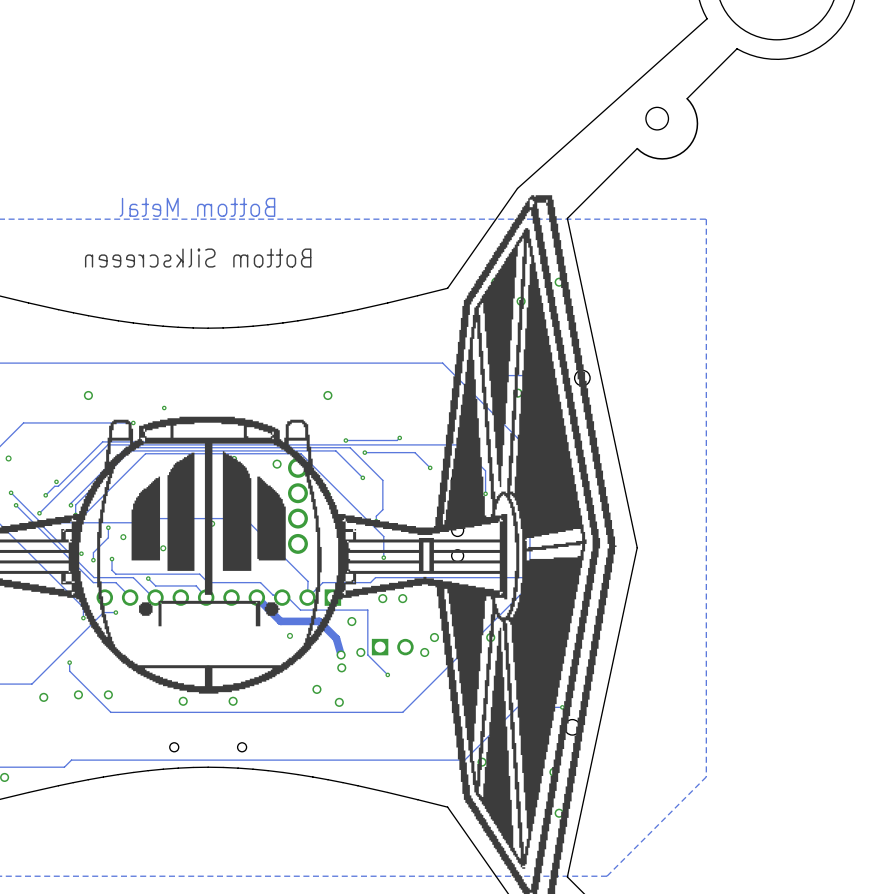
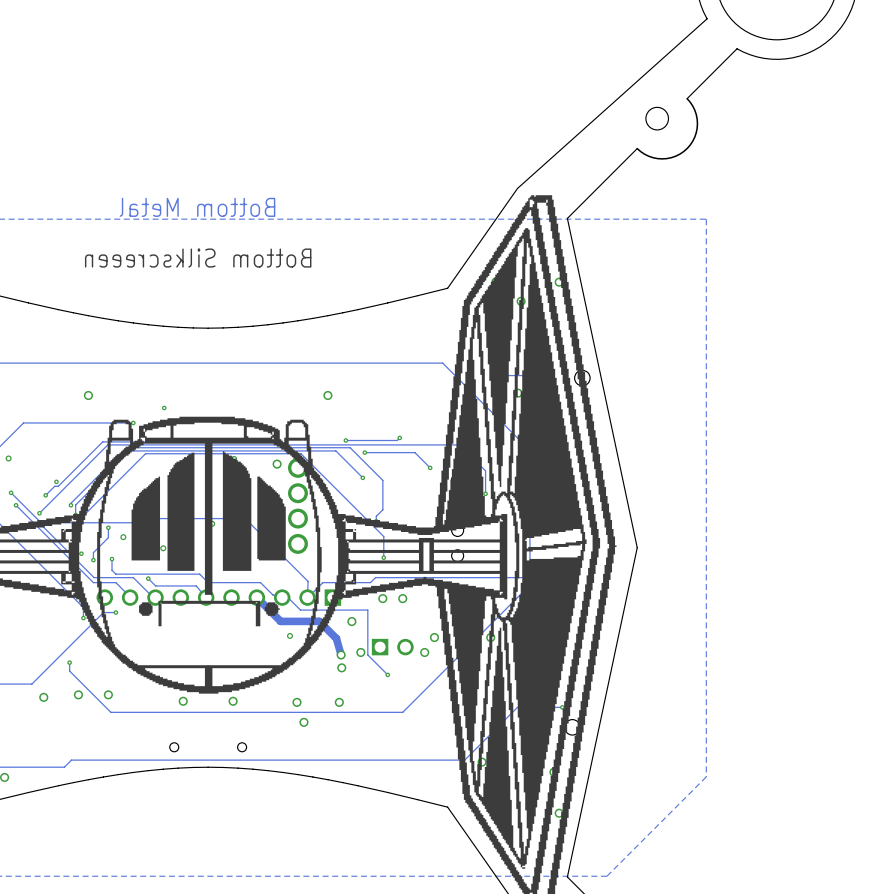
via: (316, 689) -> none
via: none -> (296, 702)
via: none -> (303, 722)

